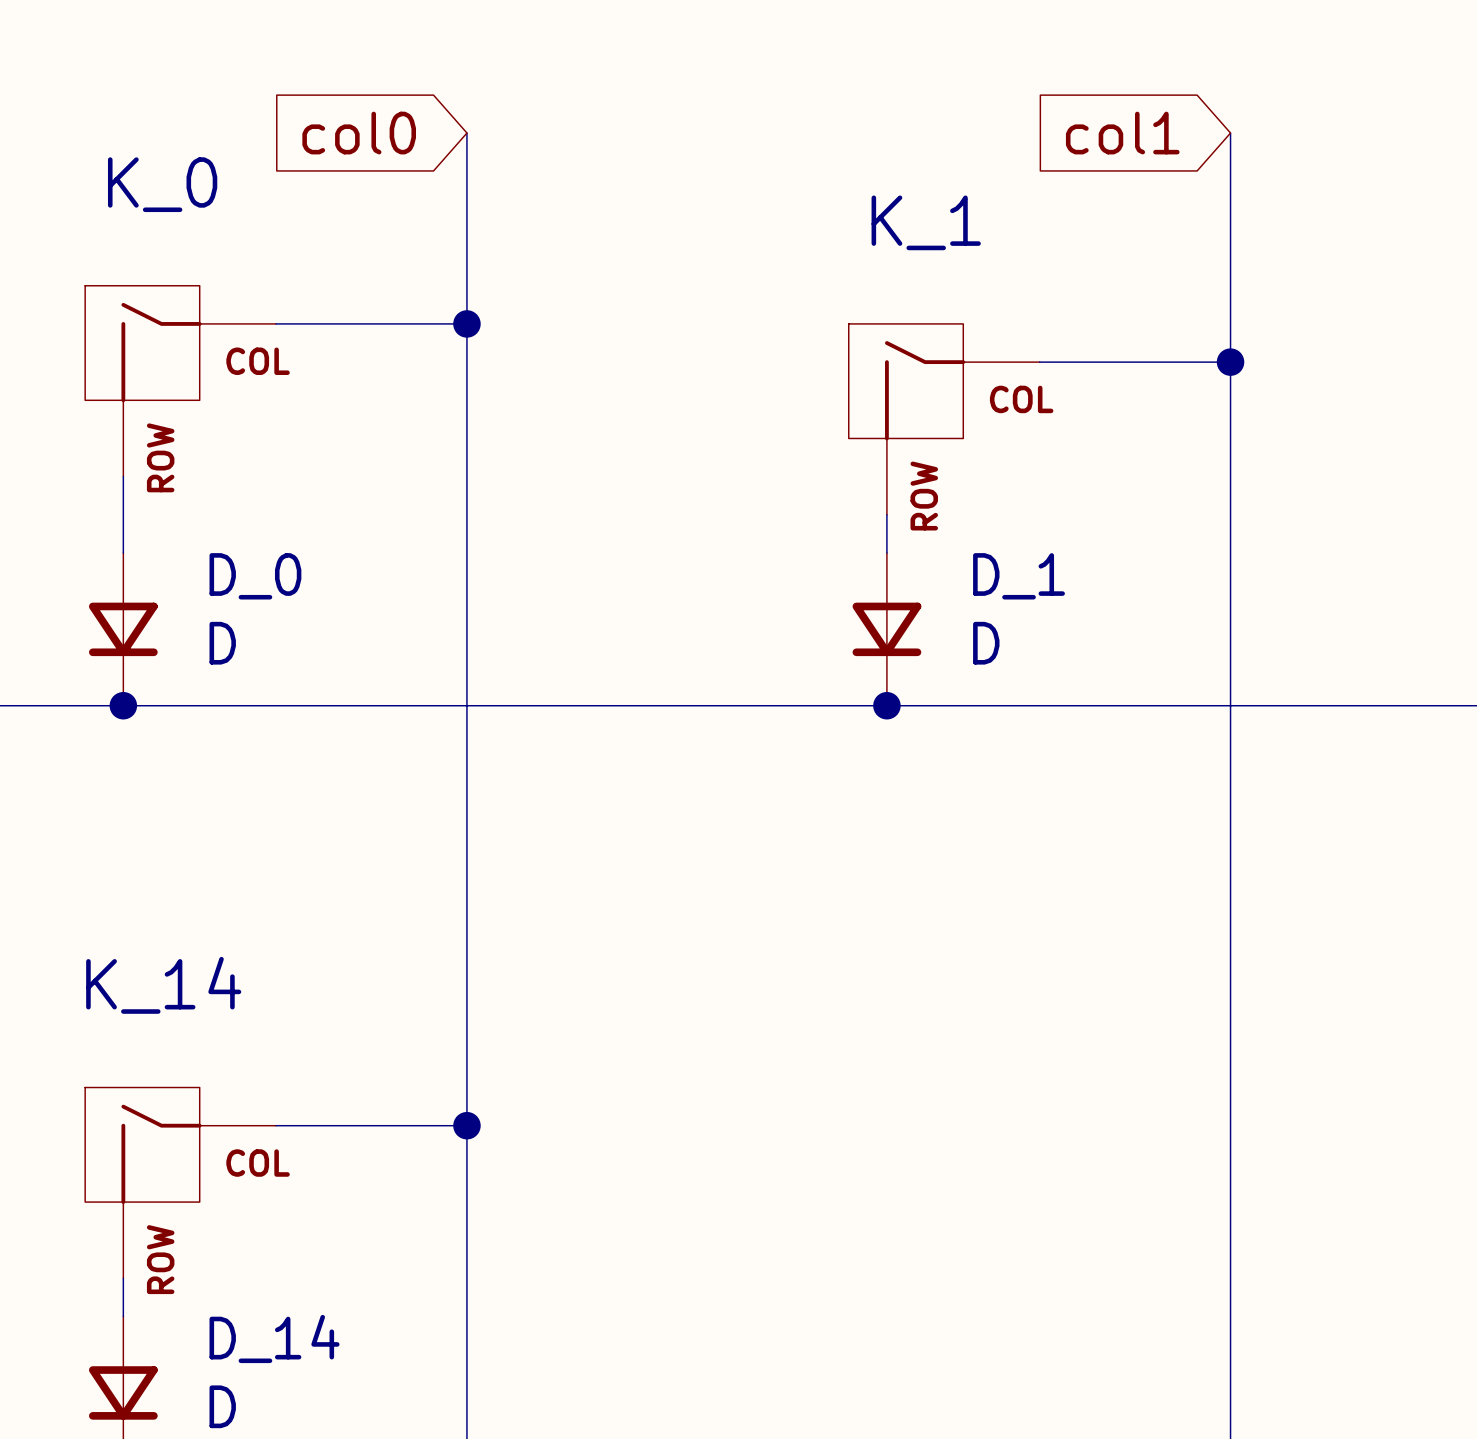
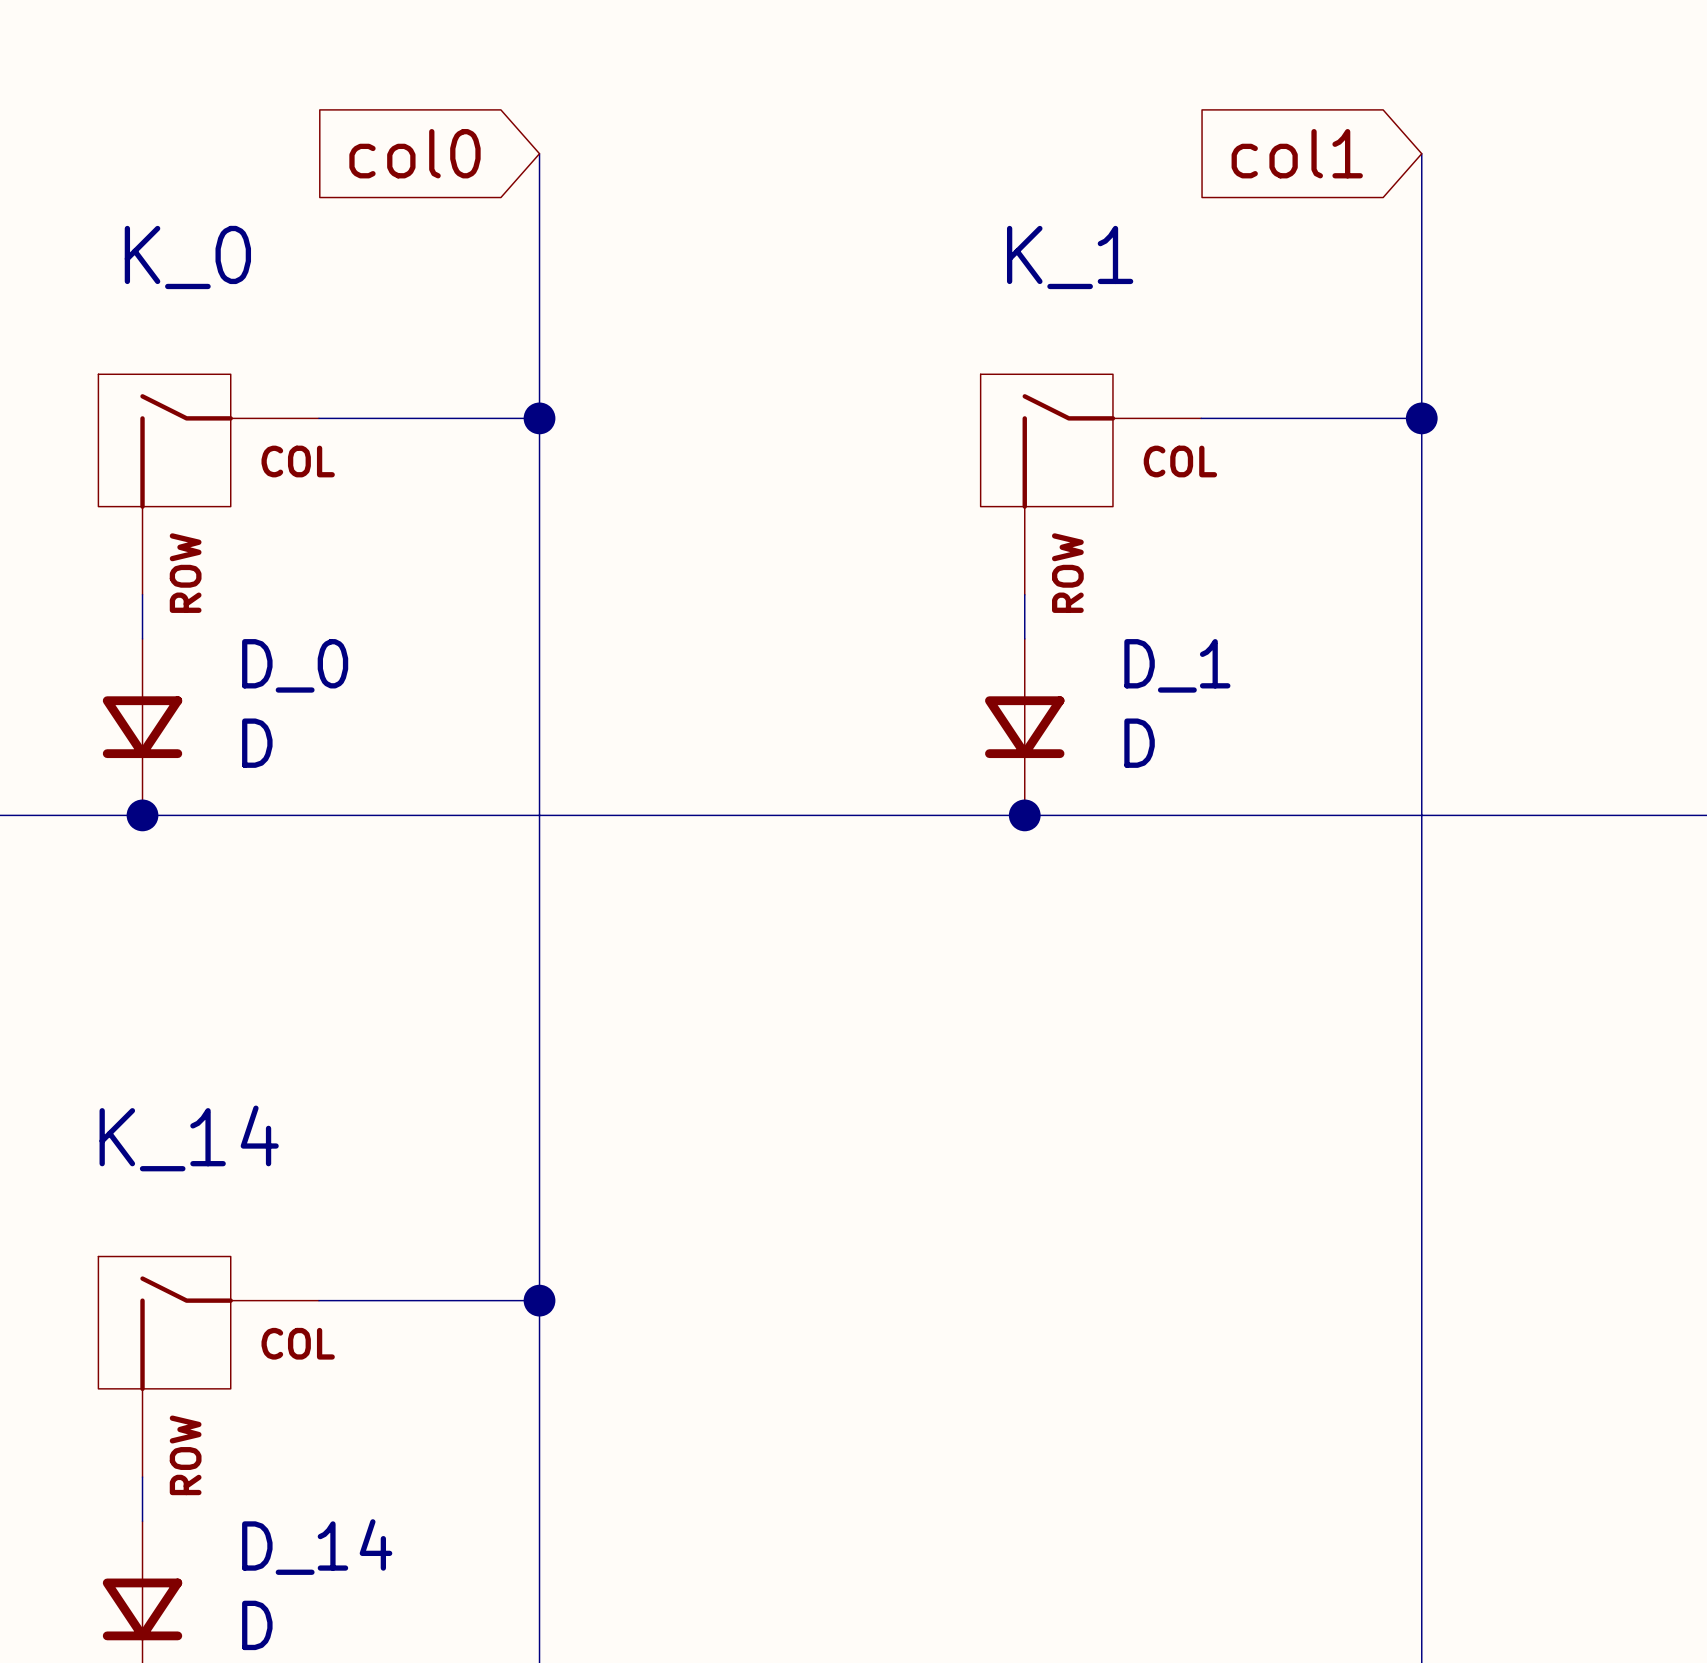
wire: (276, 323) (466, 323) -> (318, 418) (539, 418)
junction position: (466, 323) -> (539, 418)
K_0 position: (180, 381) -> (208, 484)

